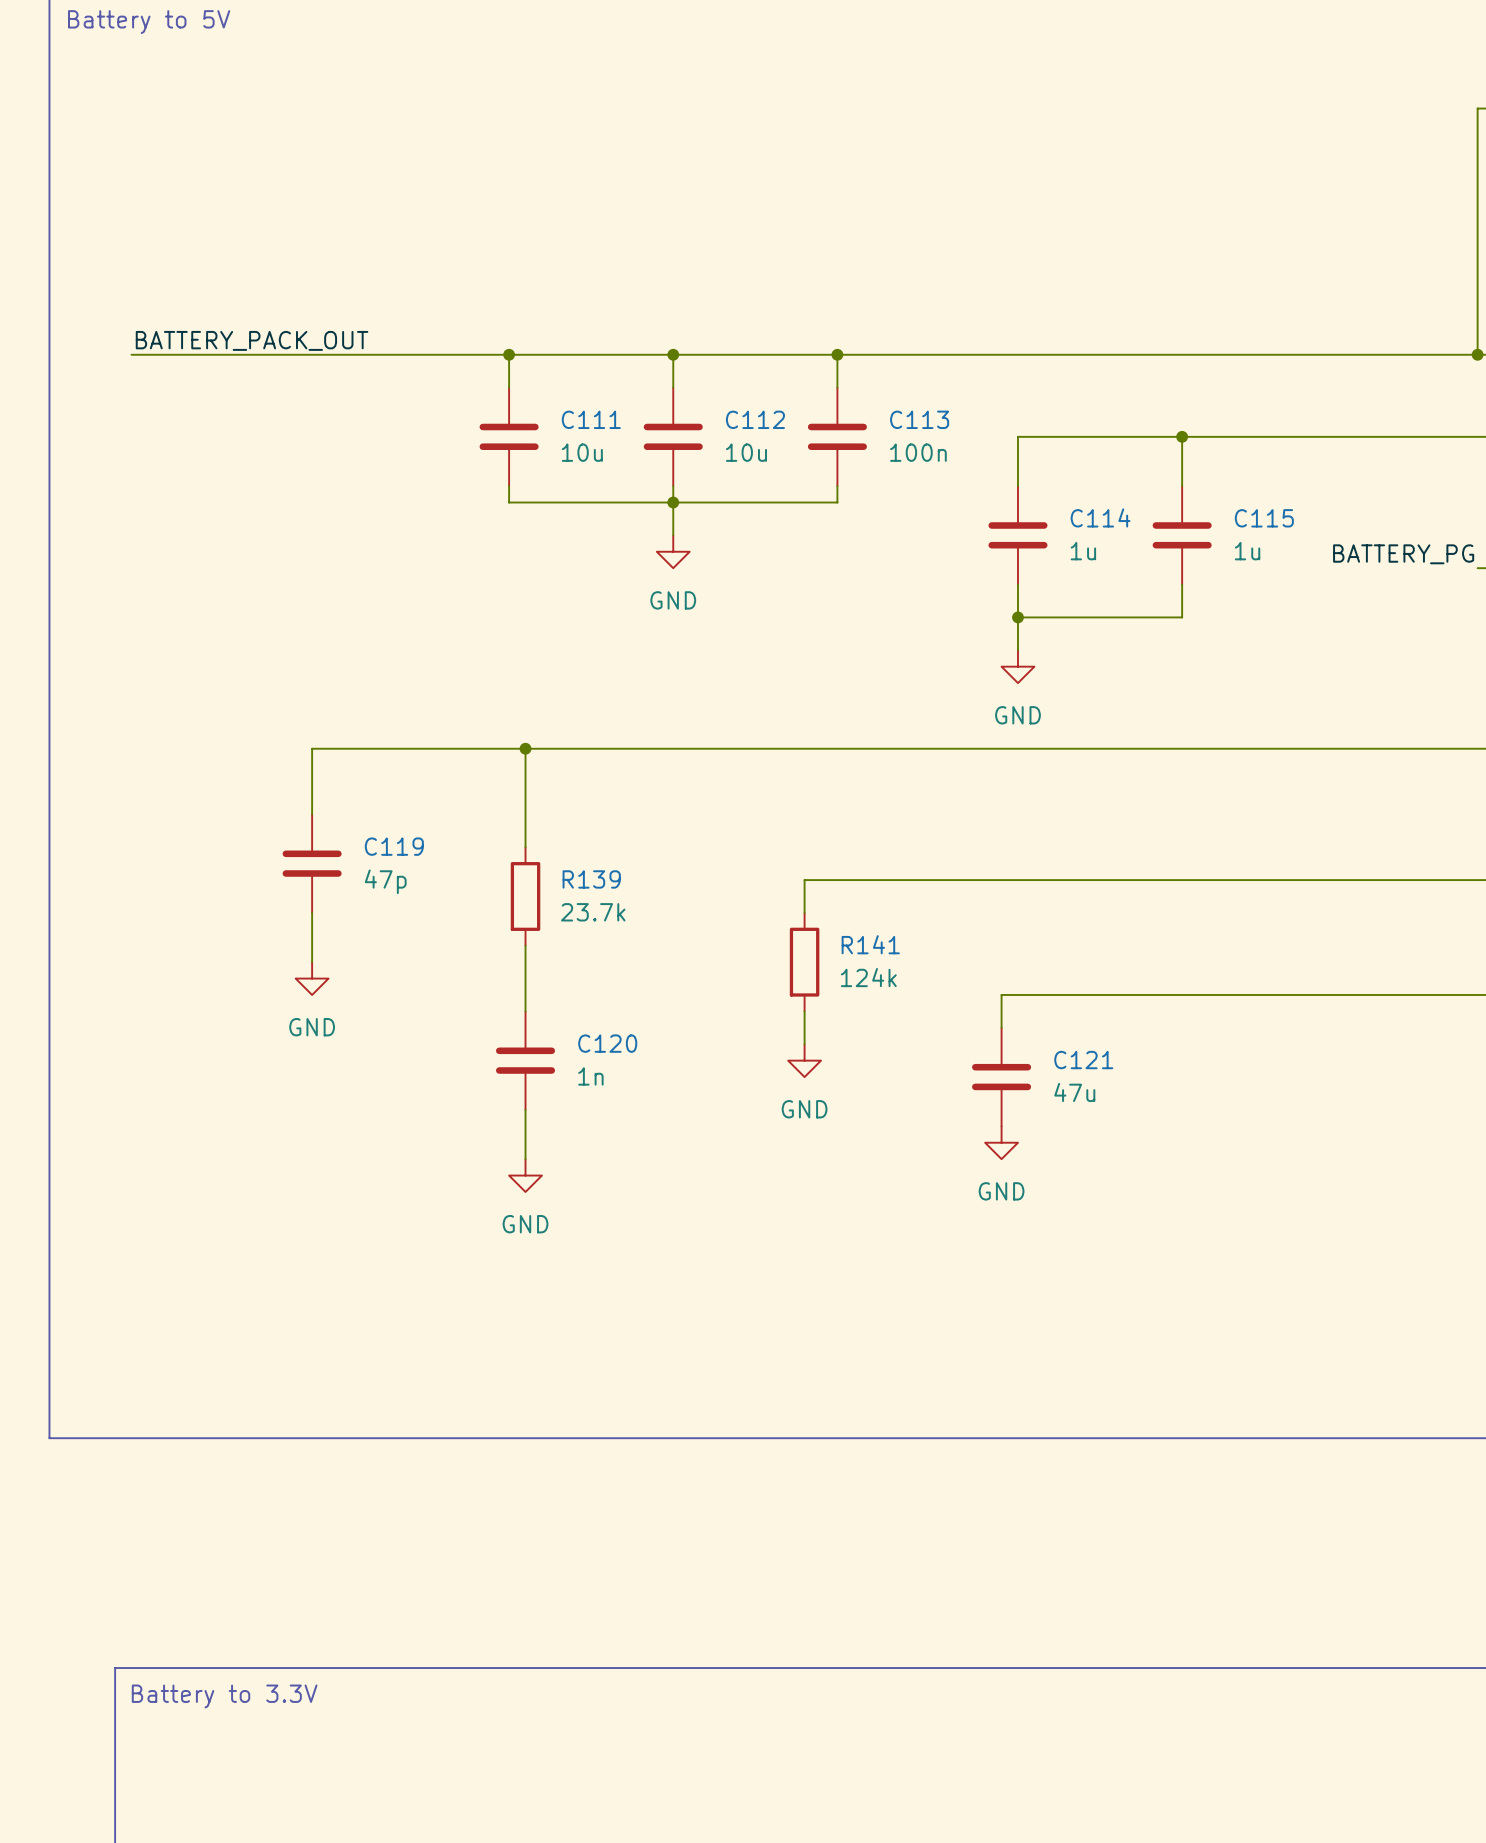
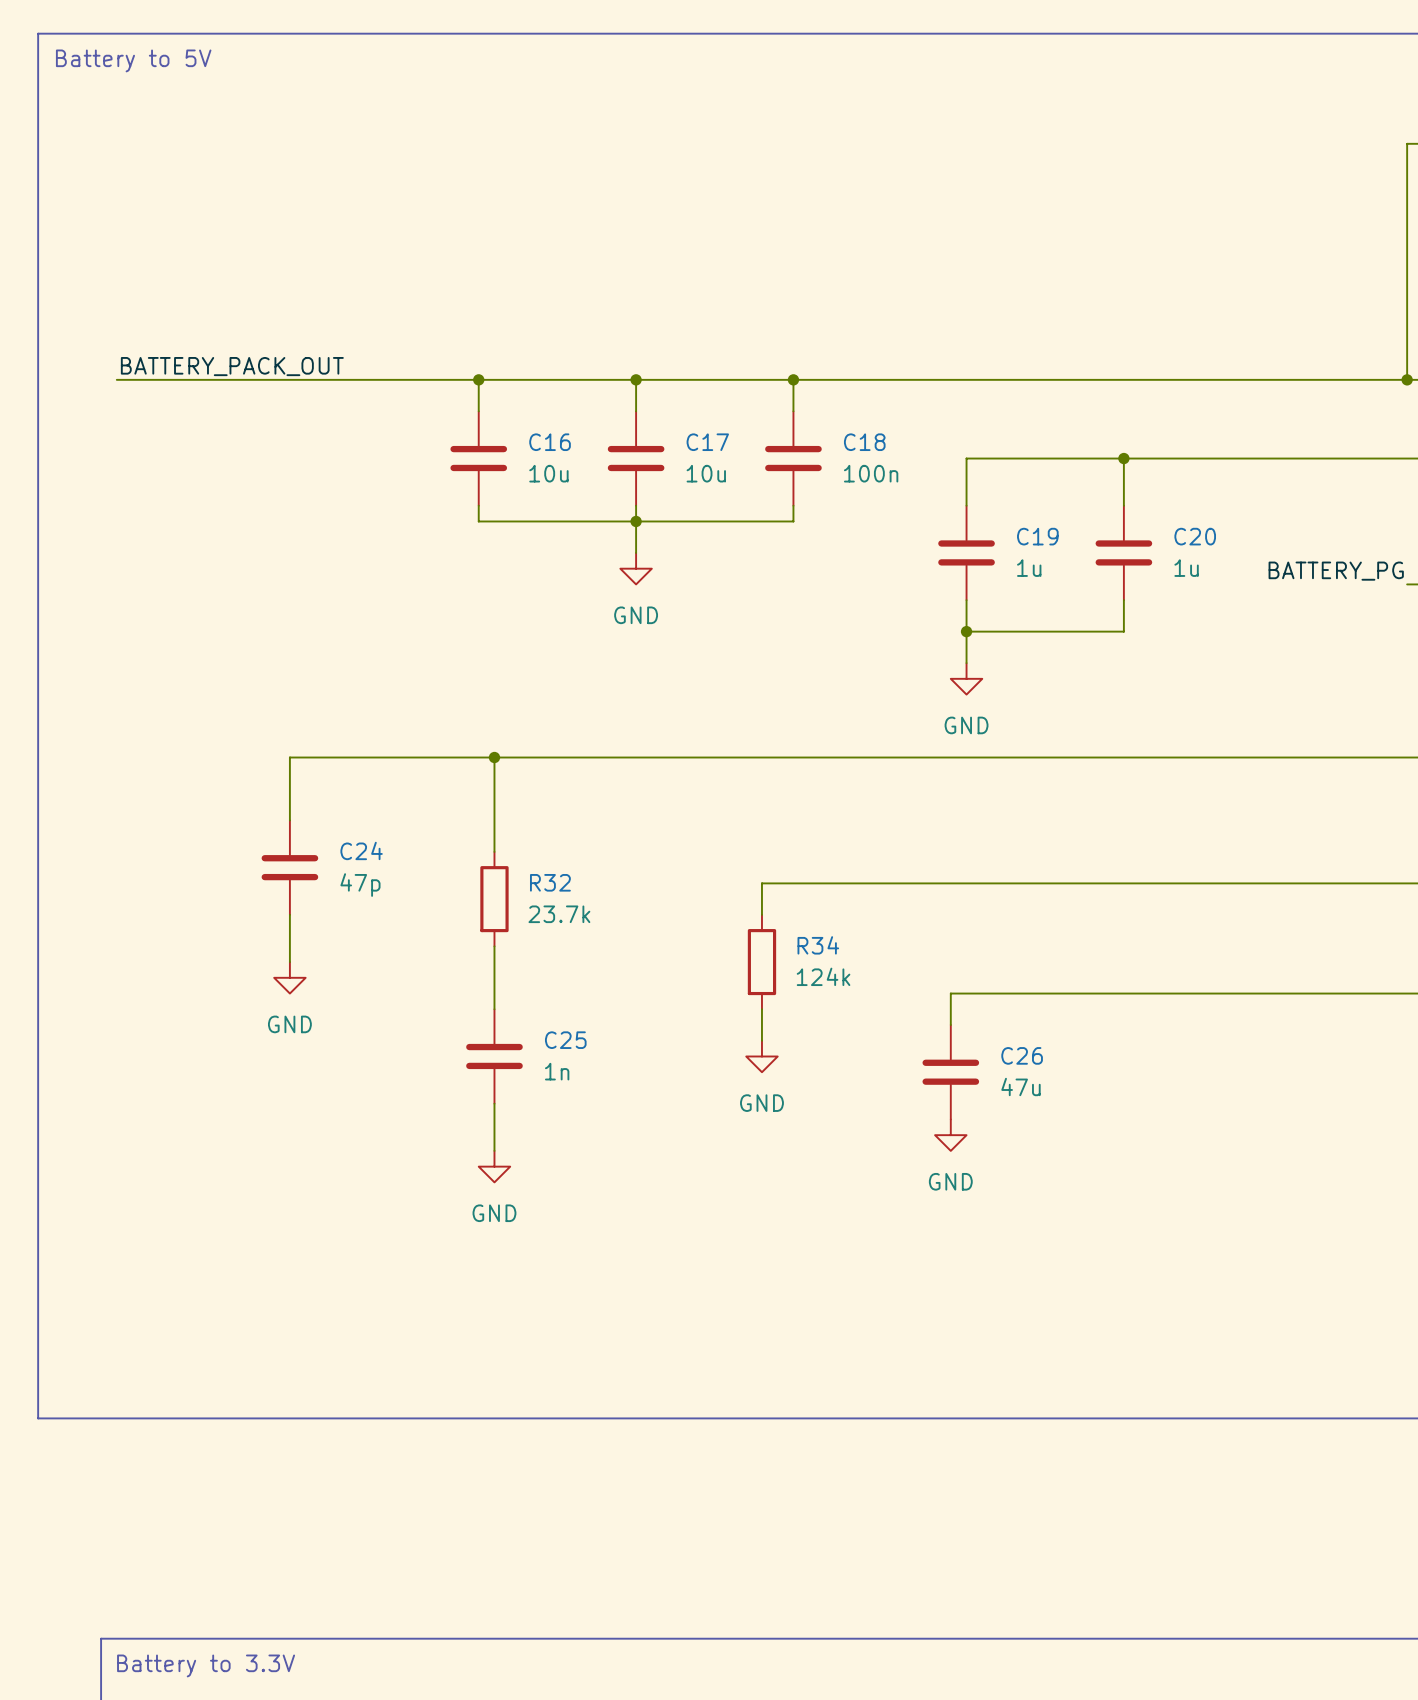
C111 name: C111 (591, 419) -> C16 (550, 442)
C112 name: C112 (755, 419) -> C17 (707, 442)
C113 name: C113 (919, 419) -> C18 (864, 442)
C114 name: C114 (1100, 517) -> C19 (1037, 536)
C115 name: C115 (1264, 518) -> C20 (1195, 536)
C119 name: C119 (394, 846) -> C24 (361, 850)
R139 name: R139 (591, 879) -> R32 (550, 882)
R141 name: R141 (870, 944) -> R34 (818, 945)
C120 name: C120 (607, 1043) -> C25 (565, 1040)
C121 name: C121 (1083, 1060) -> C26 (1022, 1055)

